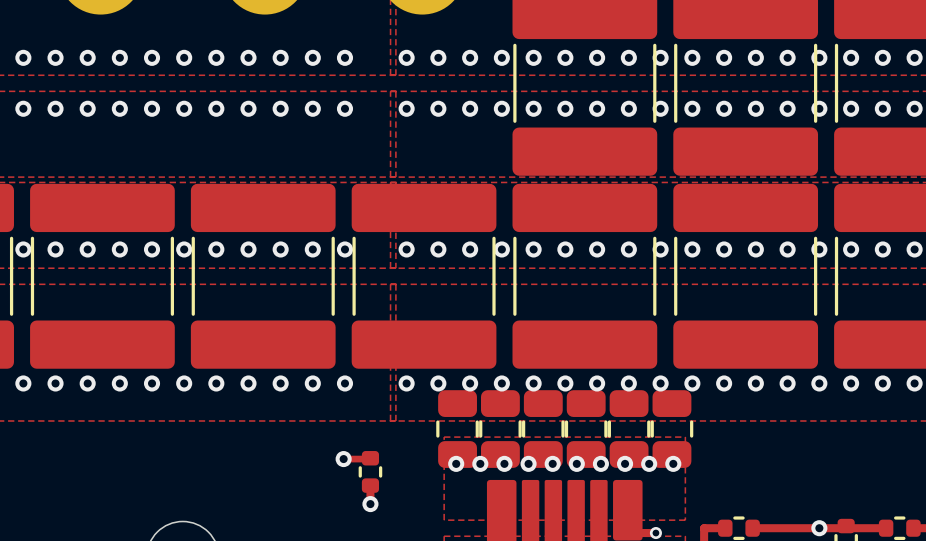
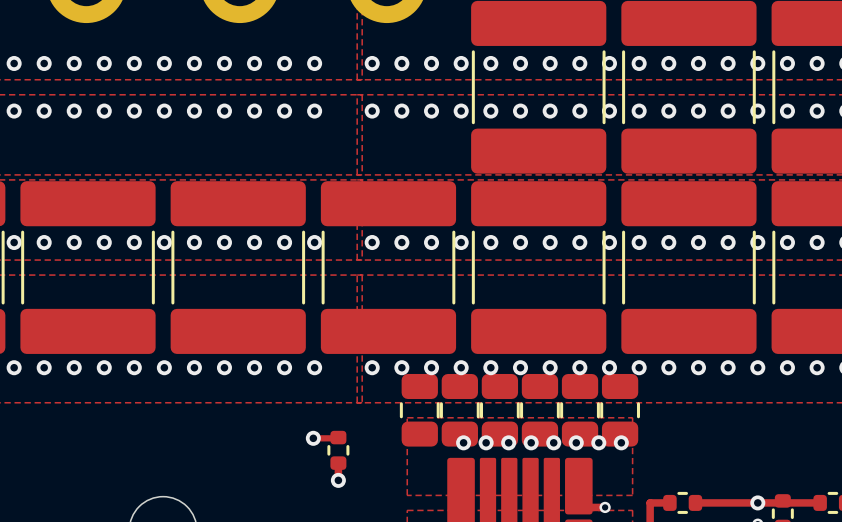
via: (456, 463) -> none
via: (480, 463) -> none

